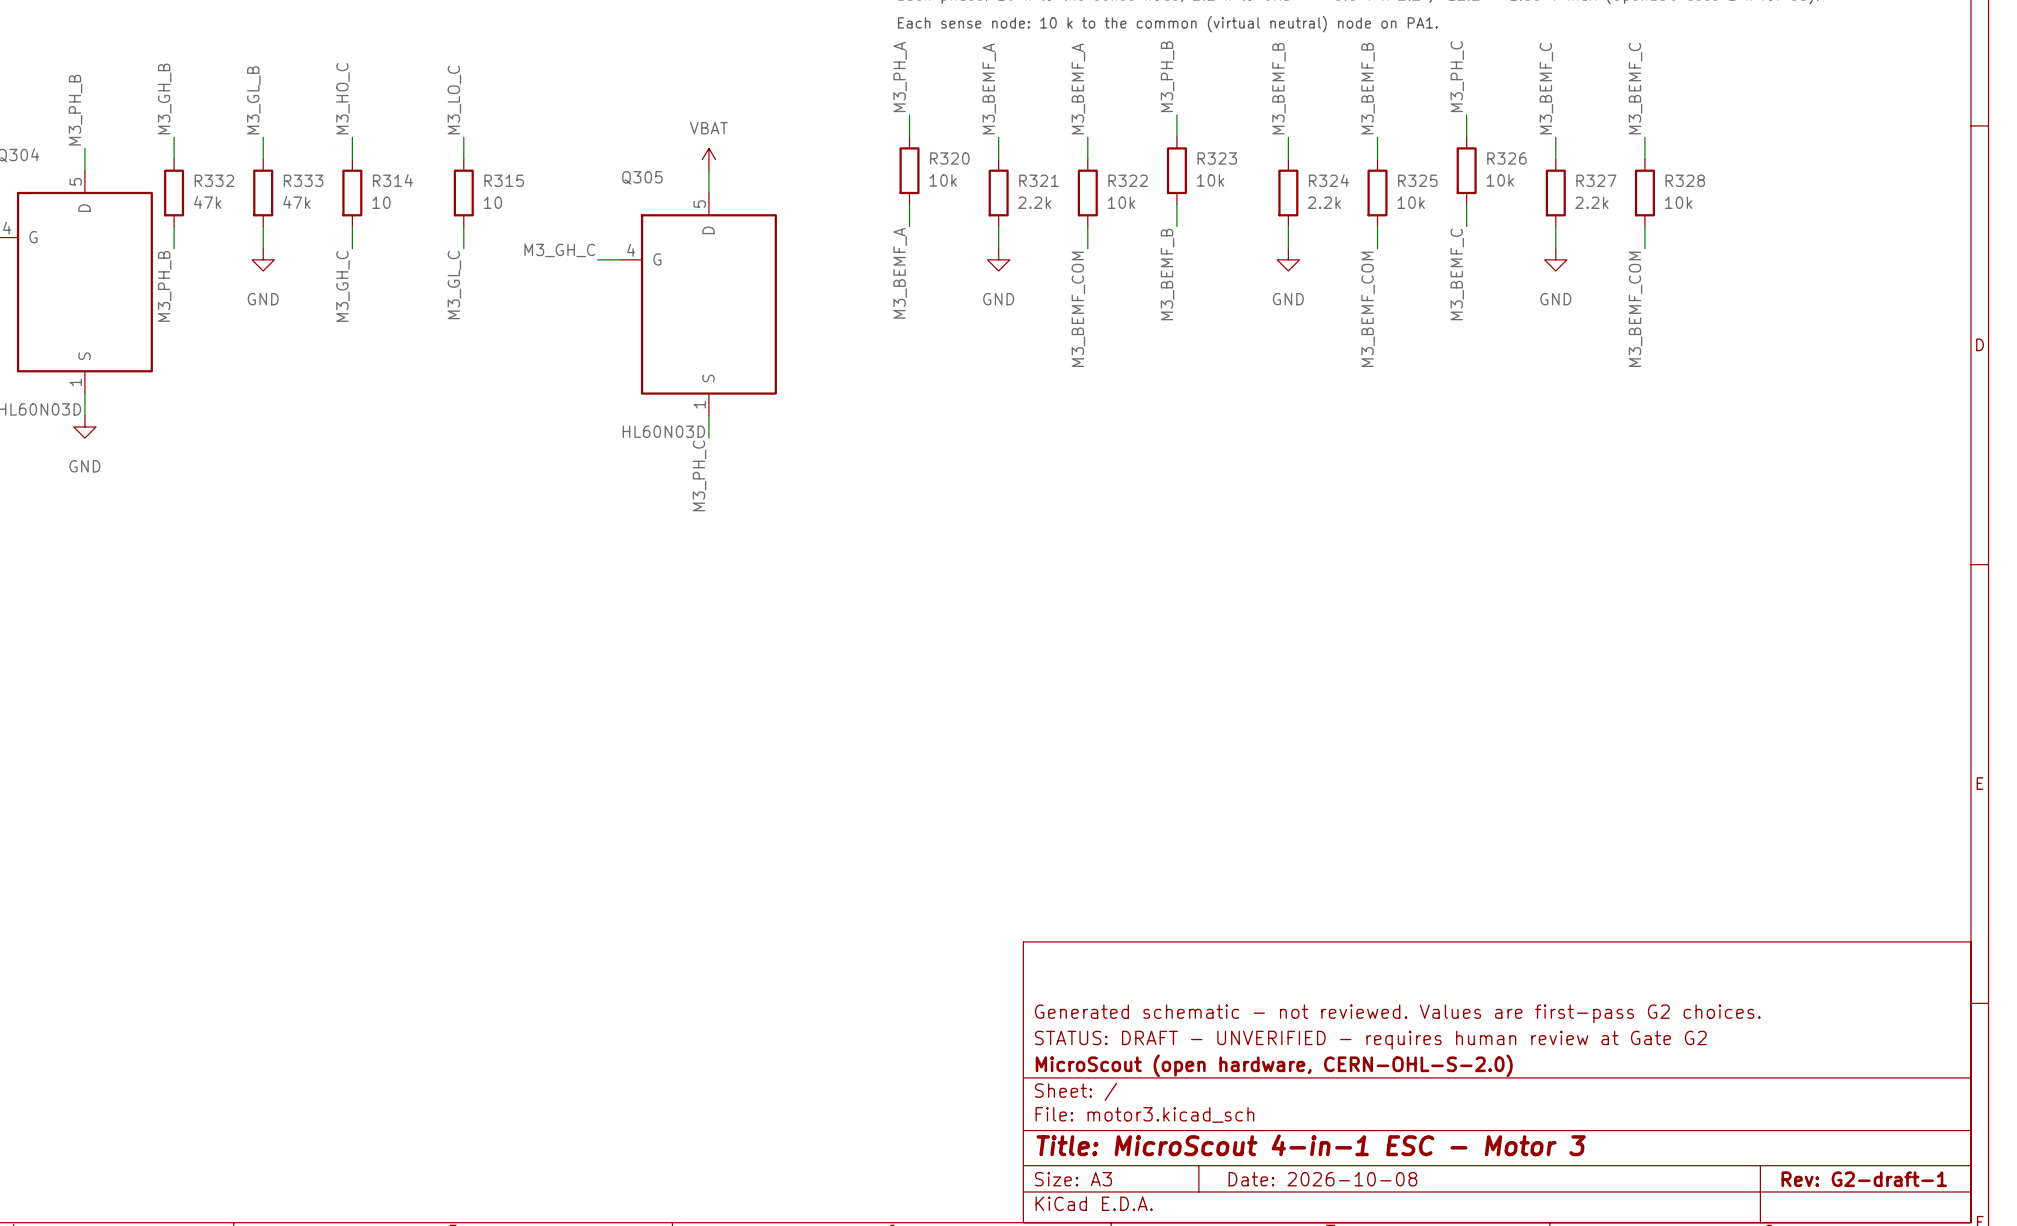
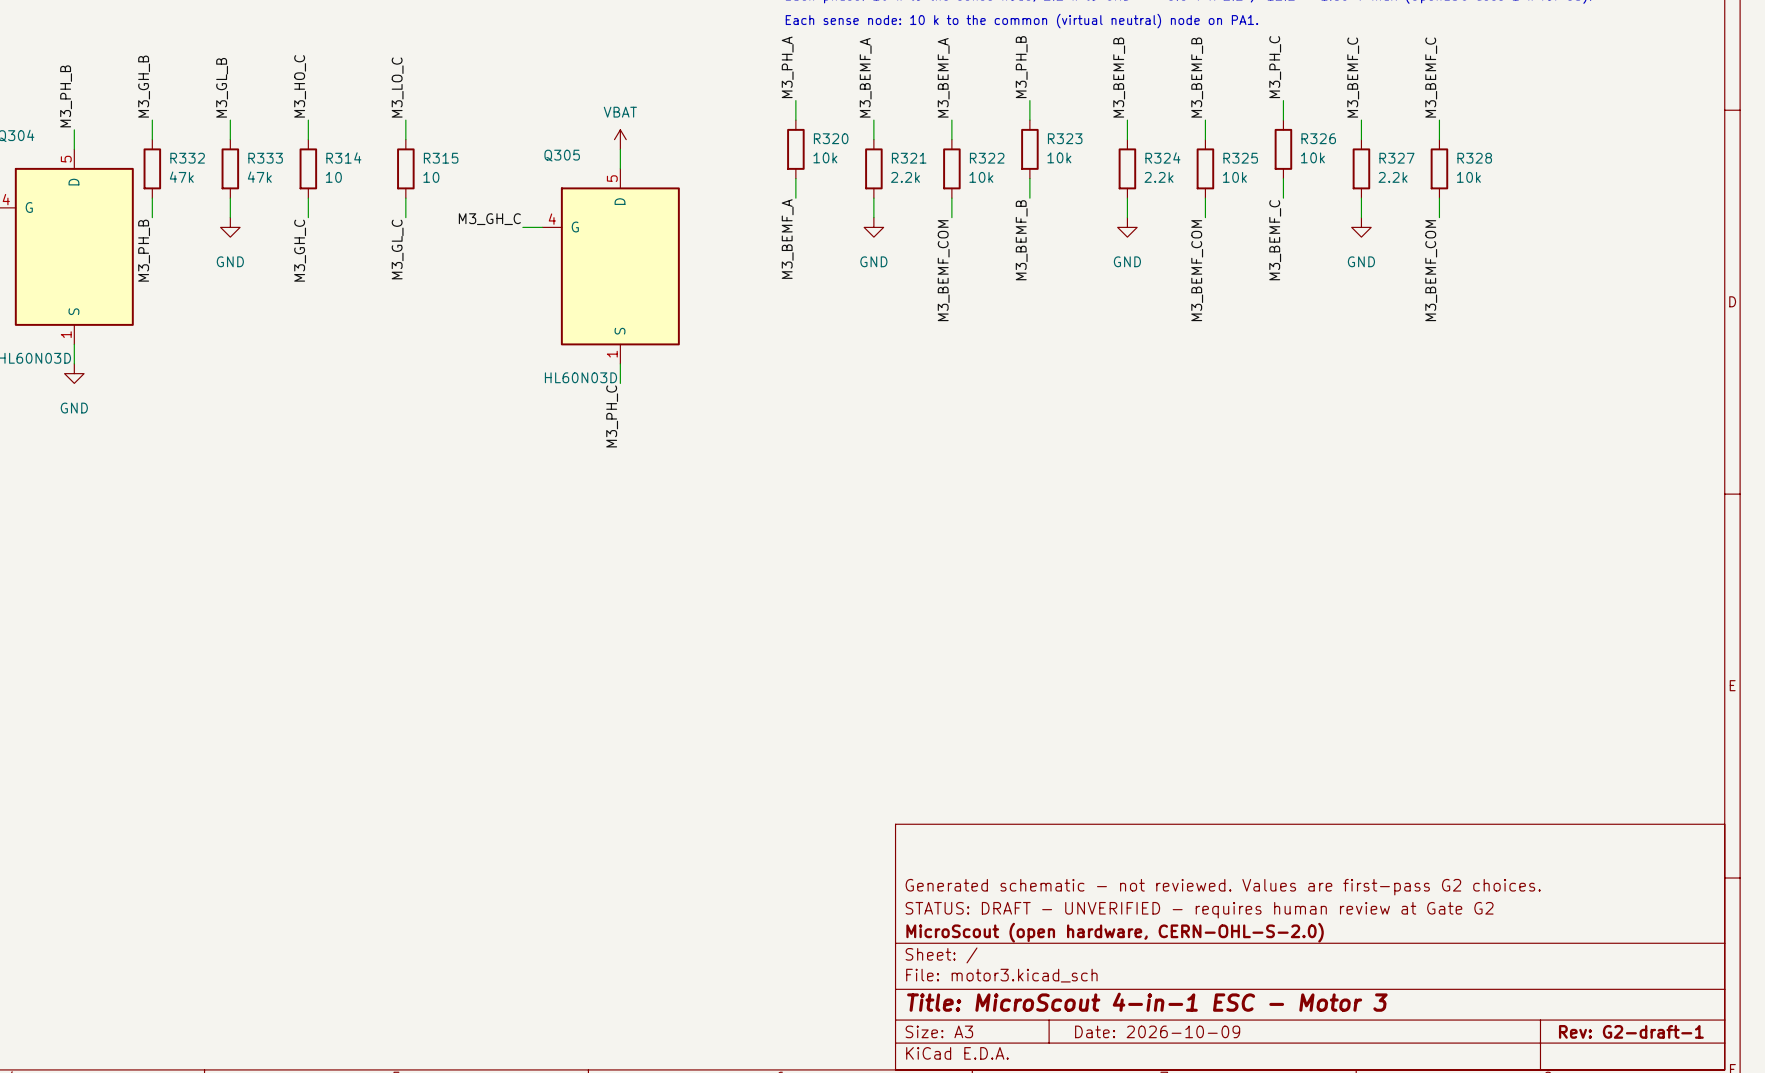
title block: Date: 2026-10-08 (1322, 1179) -> Date: 2026-10-09 (1157, 1031)

